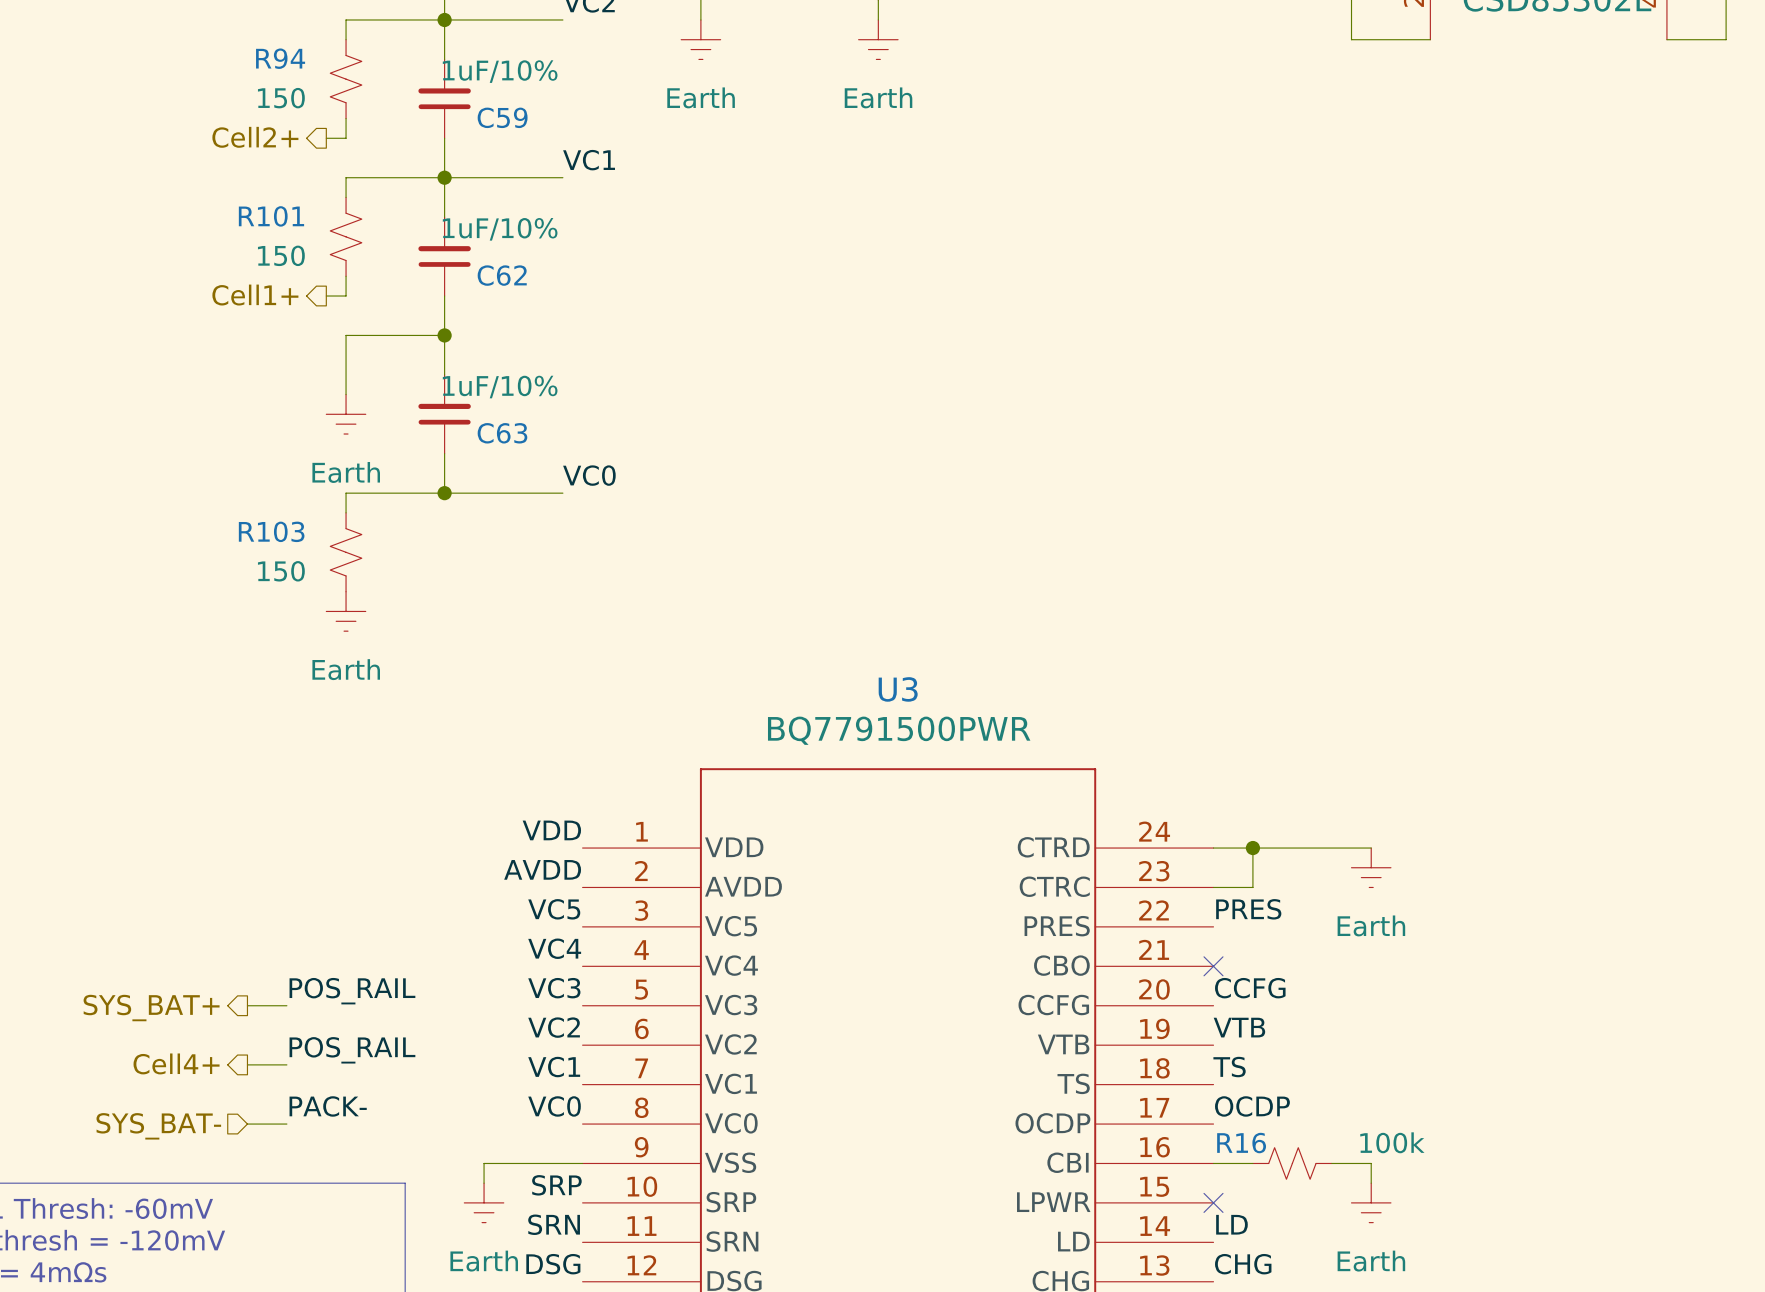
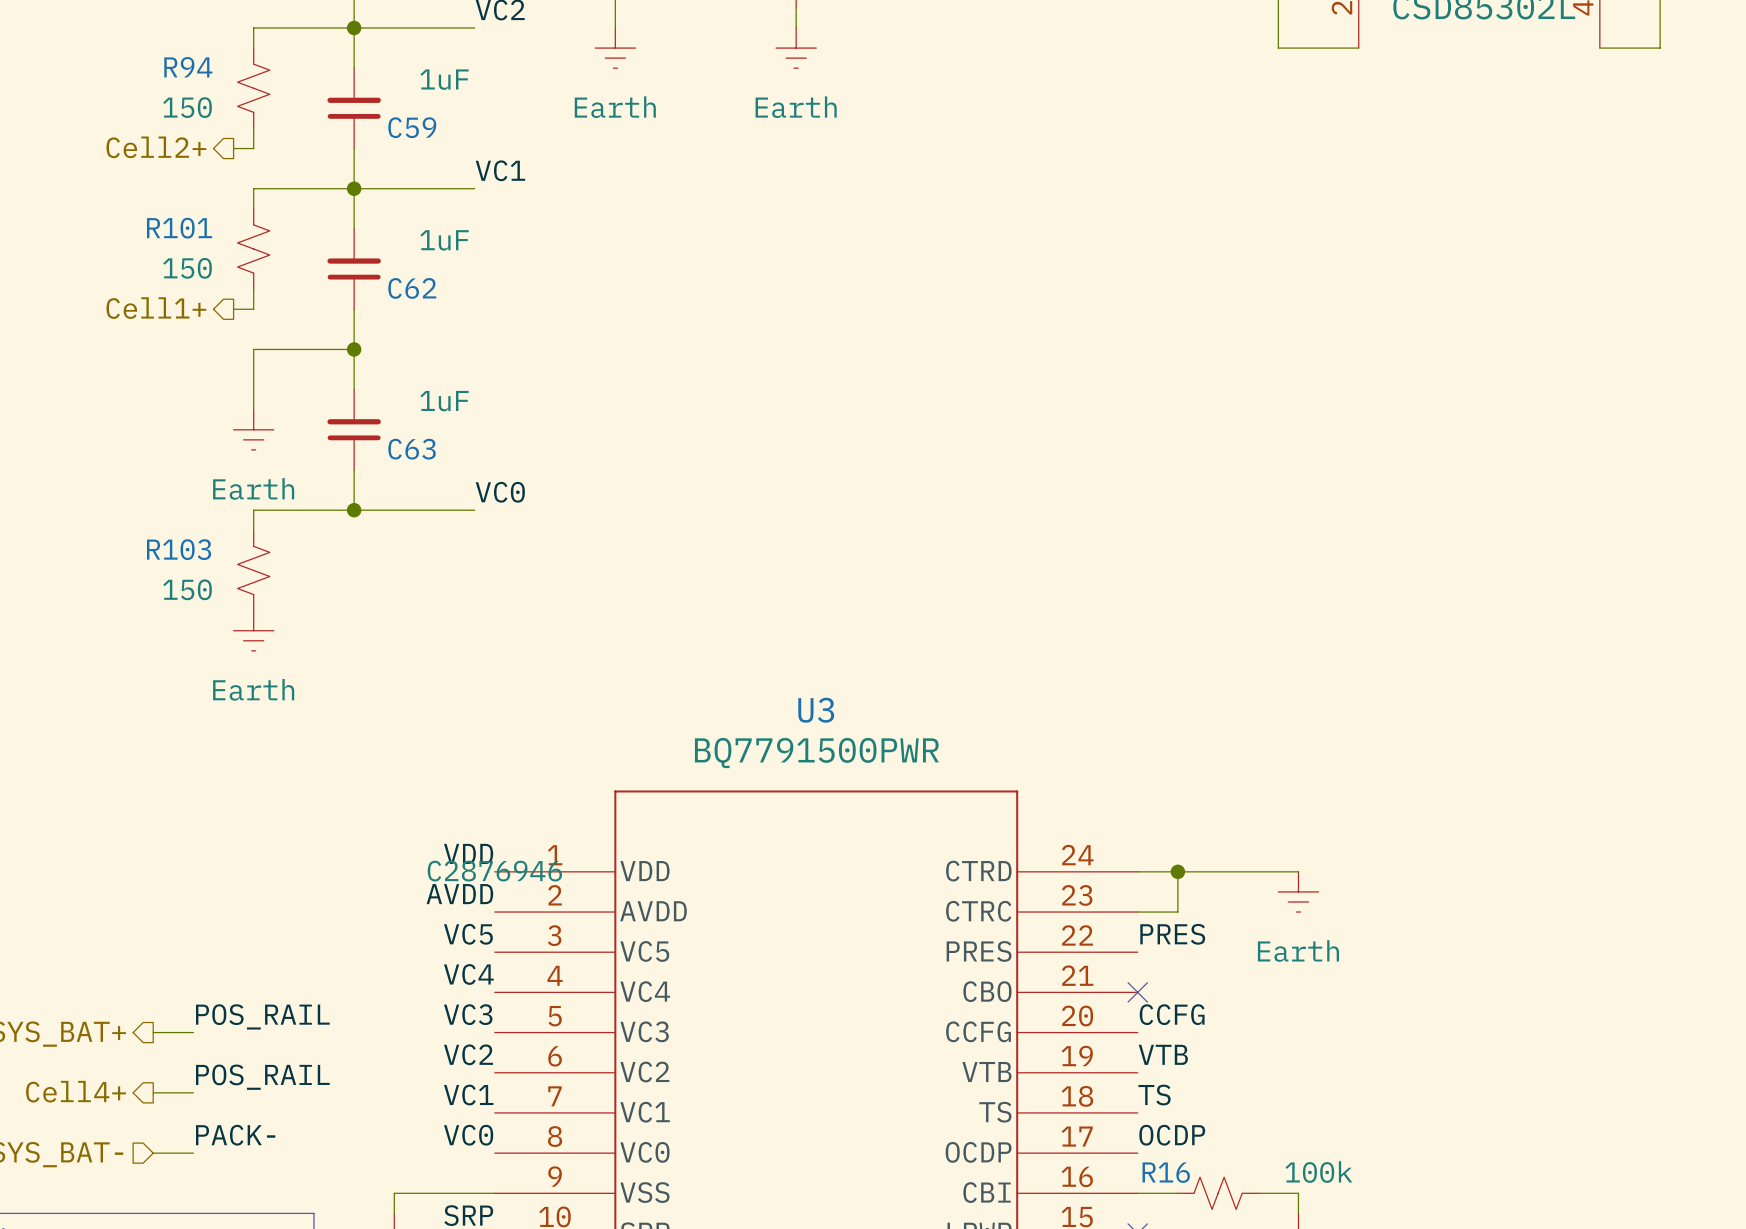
C59 value: 1uF/10% (500, 71) -> 1uF (444, 79)
C62 value: 1uF/10% (500, 229) -> 1uF (444, 240)
C63 value: 1uF/10% (500, 387) -> 1uF (444, 401)
U3 text: none -> C2876946 (494, 871)

